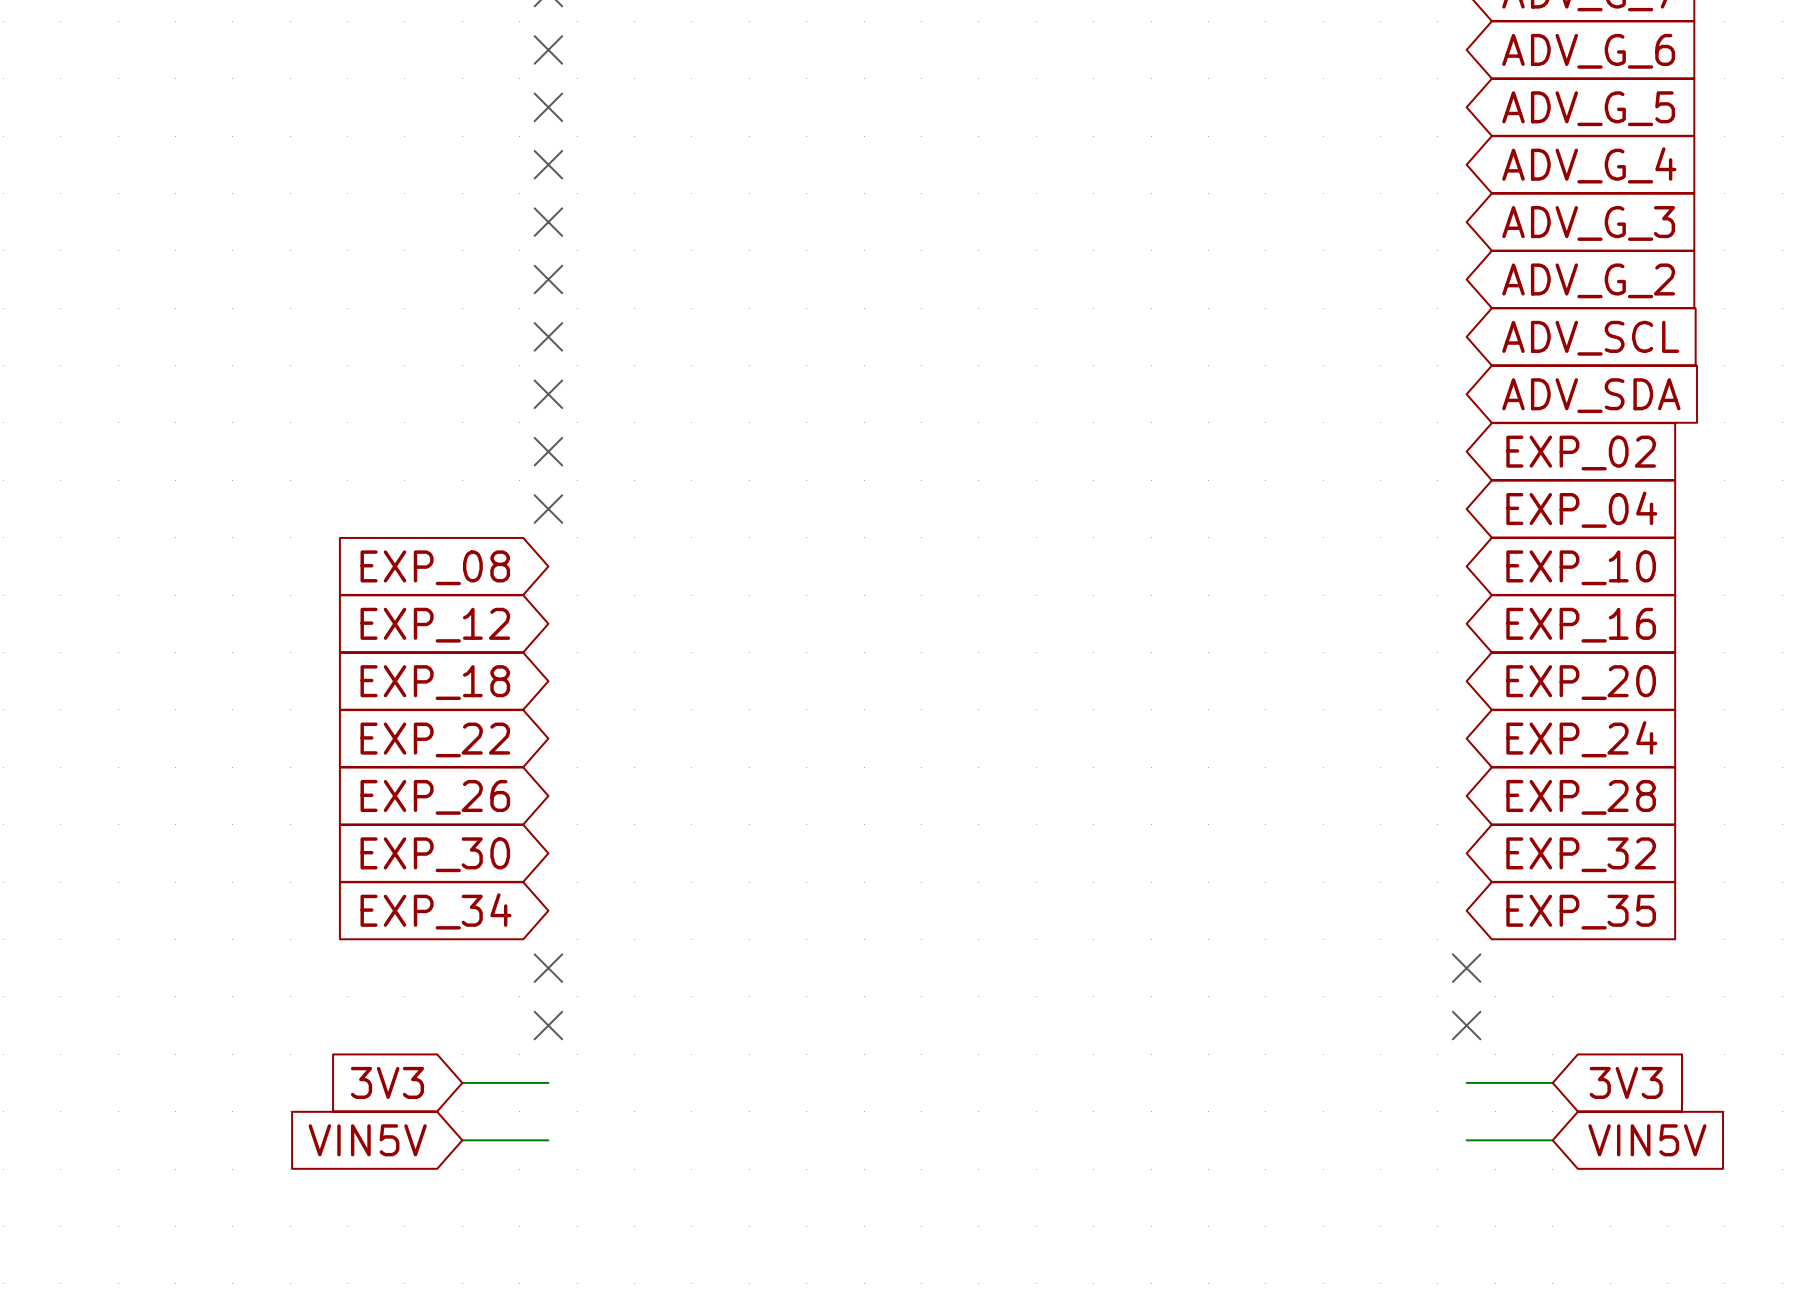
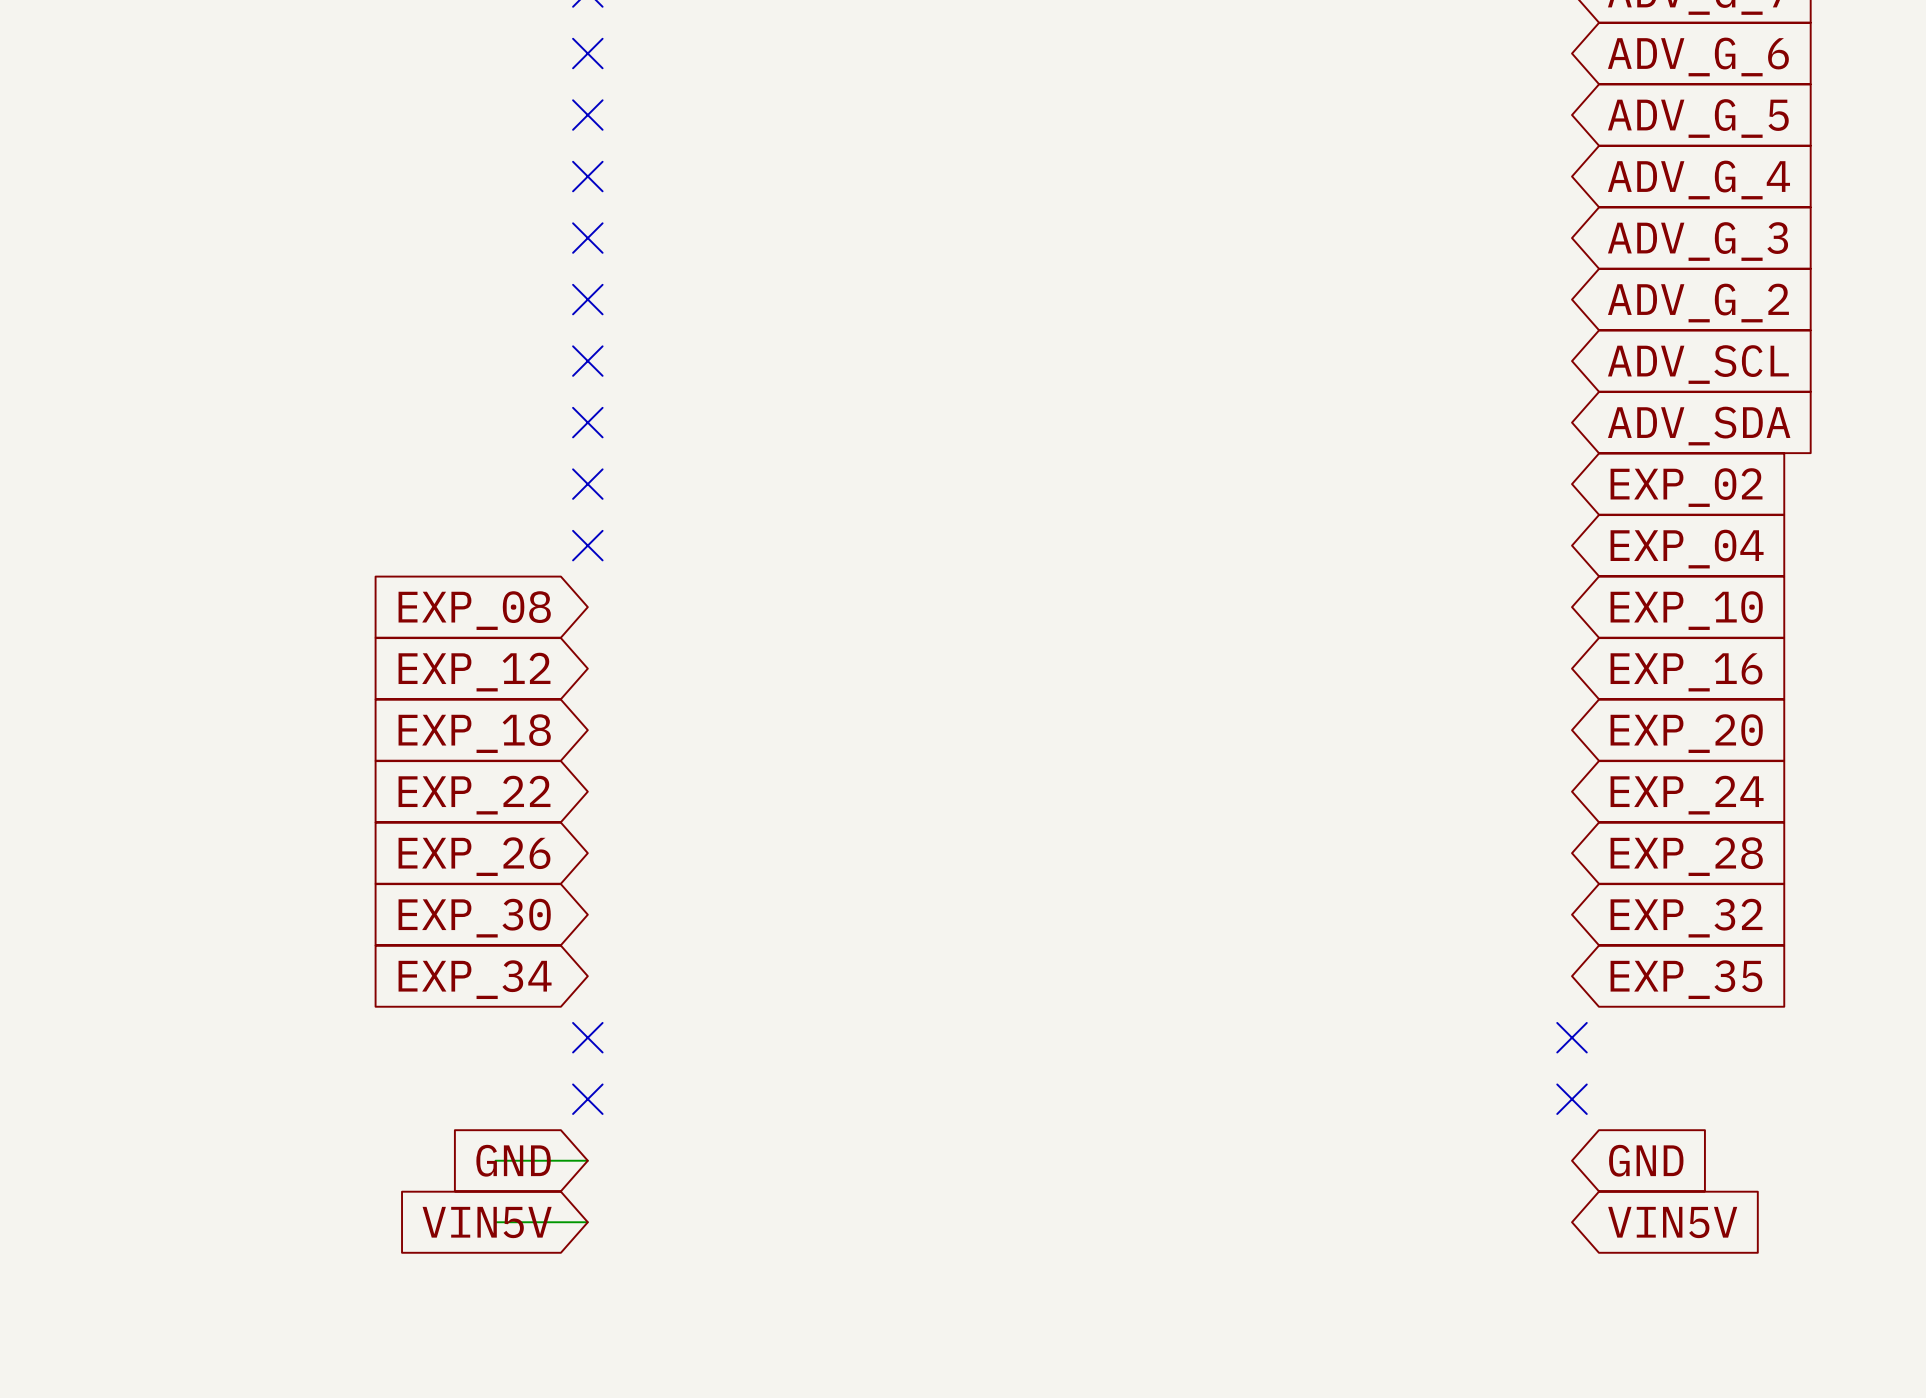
global label: 3V3 (387, 1082) -> none
global label: none -> GND (513, 1160)
wire: (1466, 1082) (1552, 1082) -> none
global label: none -> GND (1646, 1160)
global label: 3V3 (1626, 1082) -> none
global label position: VIN5V (367, 1140) -> VIN5V (487, 1222)
wire: (1466, 1140) (1552, 1140) -> none
global label position: VIN5V (1647, 1140) -> VIN5V (1672, 1222)

